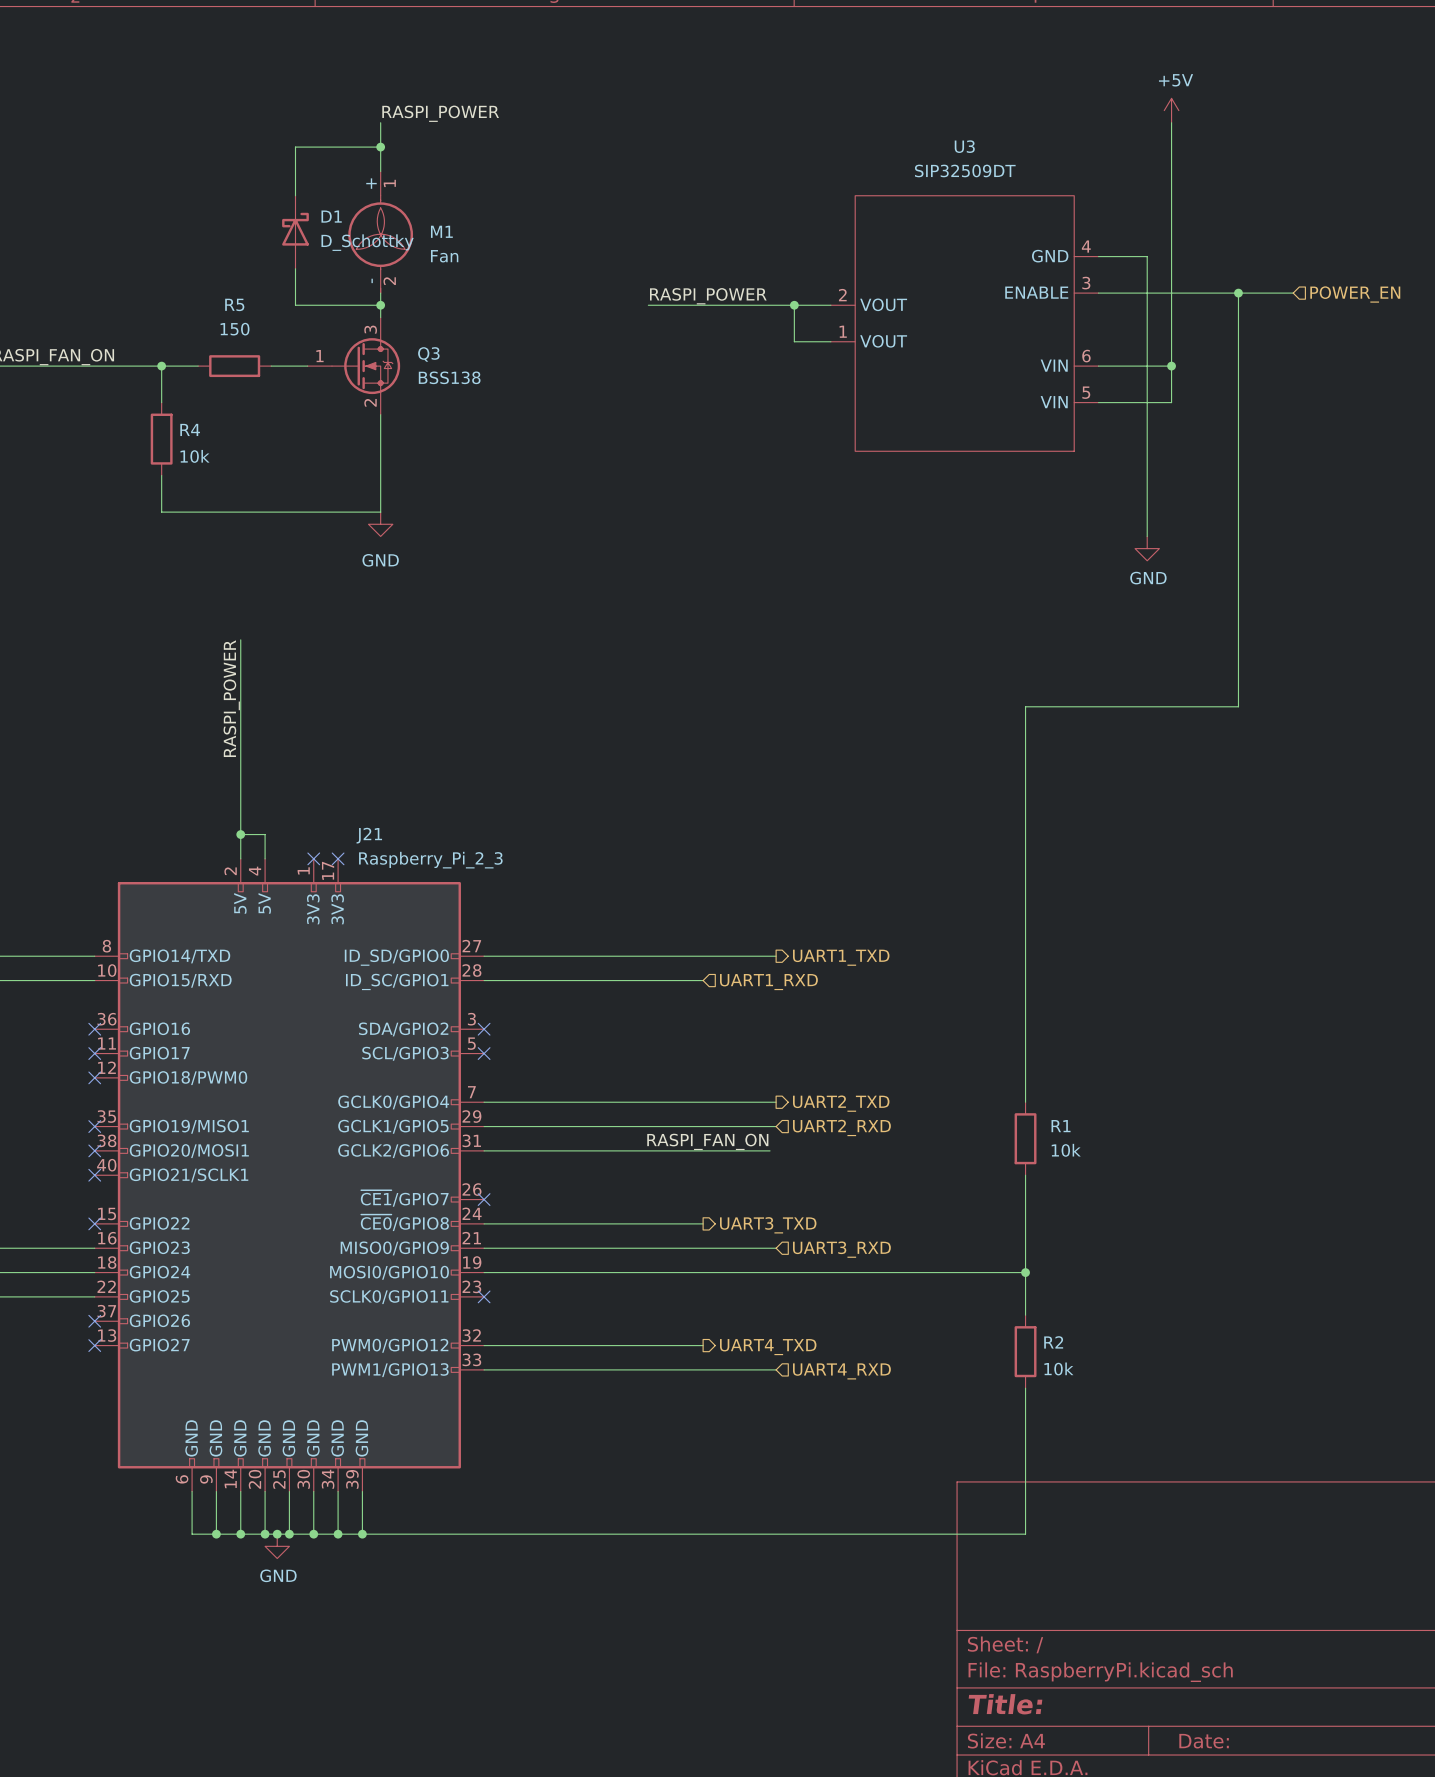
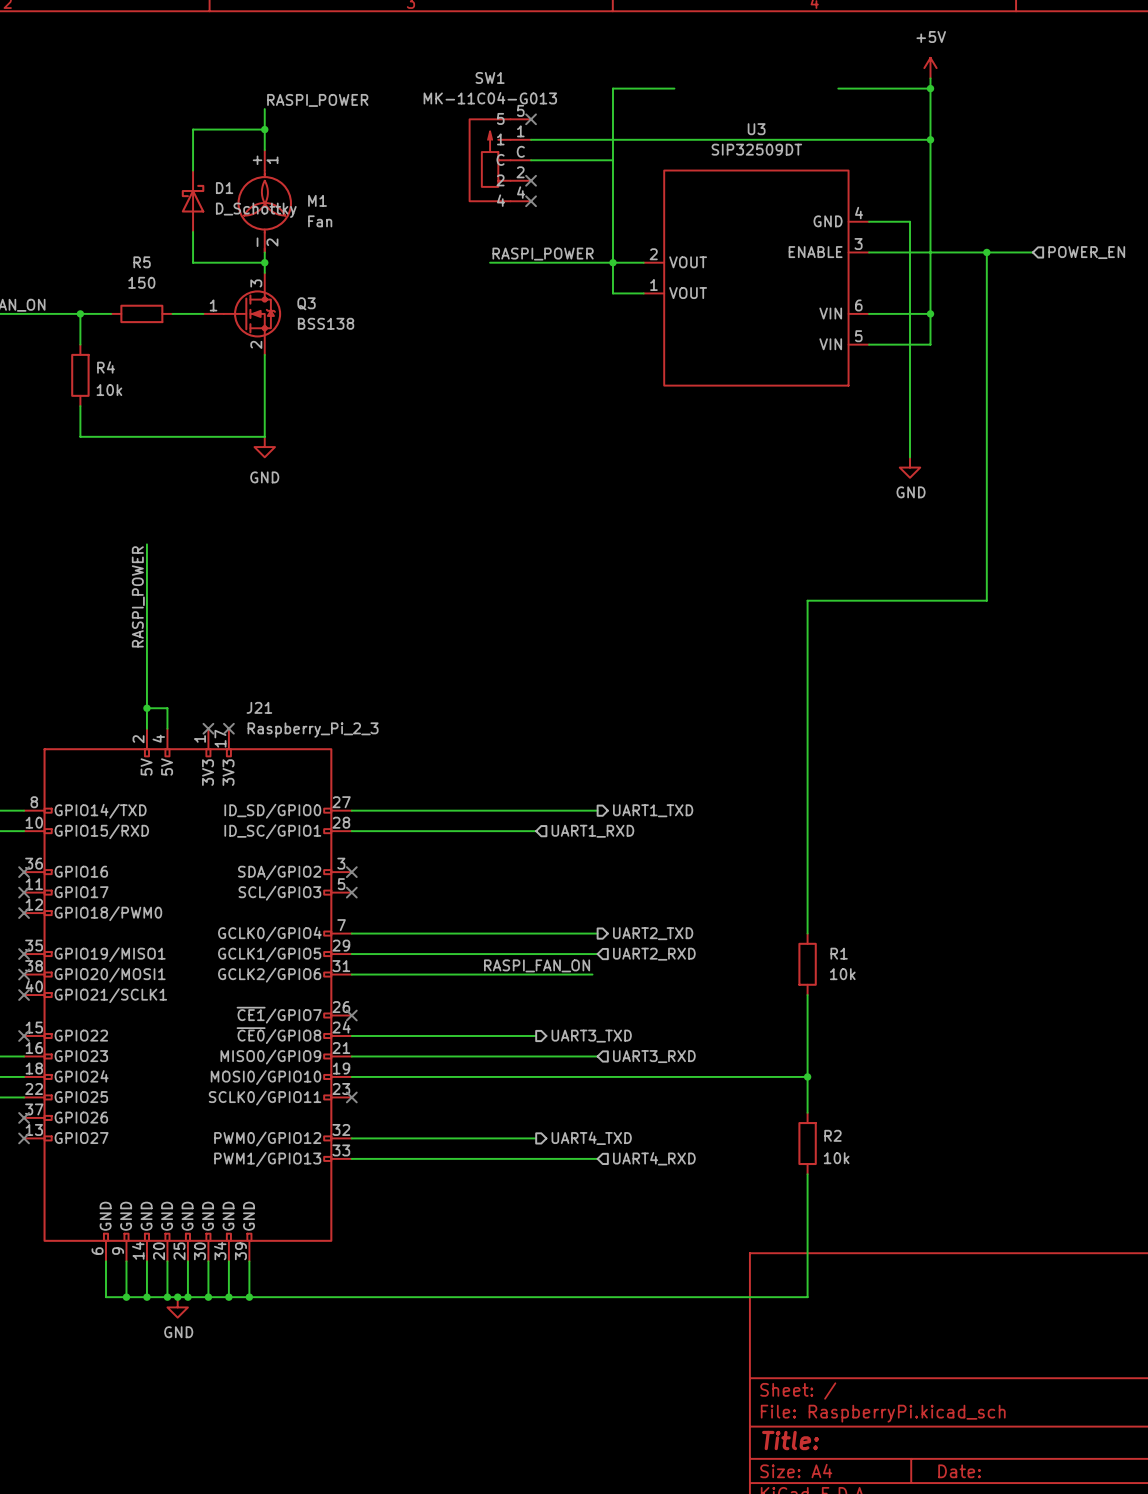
power symbol text position: +5V (1176, 80) -> +5V (931, 37)
wire: none -> (674, 88) (612, 88) (612, 262)
wire: none -> (838, 88) (930, 88)
junction: none -> (930, 88)
power symbol position: +5V (1171, 110) -> +5V (930, 68)
no-connect mark: none -> (531, 119)
wire: none -> (531, 139) (930, 139)
junction: none -> (930, 139)
SW1: none -> MK-11C04-G013 (500, 160)
wire: none -> (531, 160) (612, 160)
no-connect mark: none -> (531, 180)
no-connect mark: none -> (531, 201)

